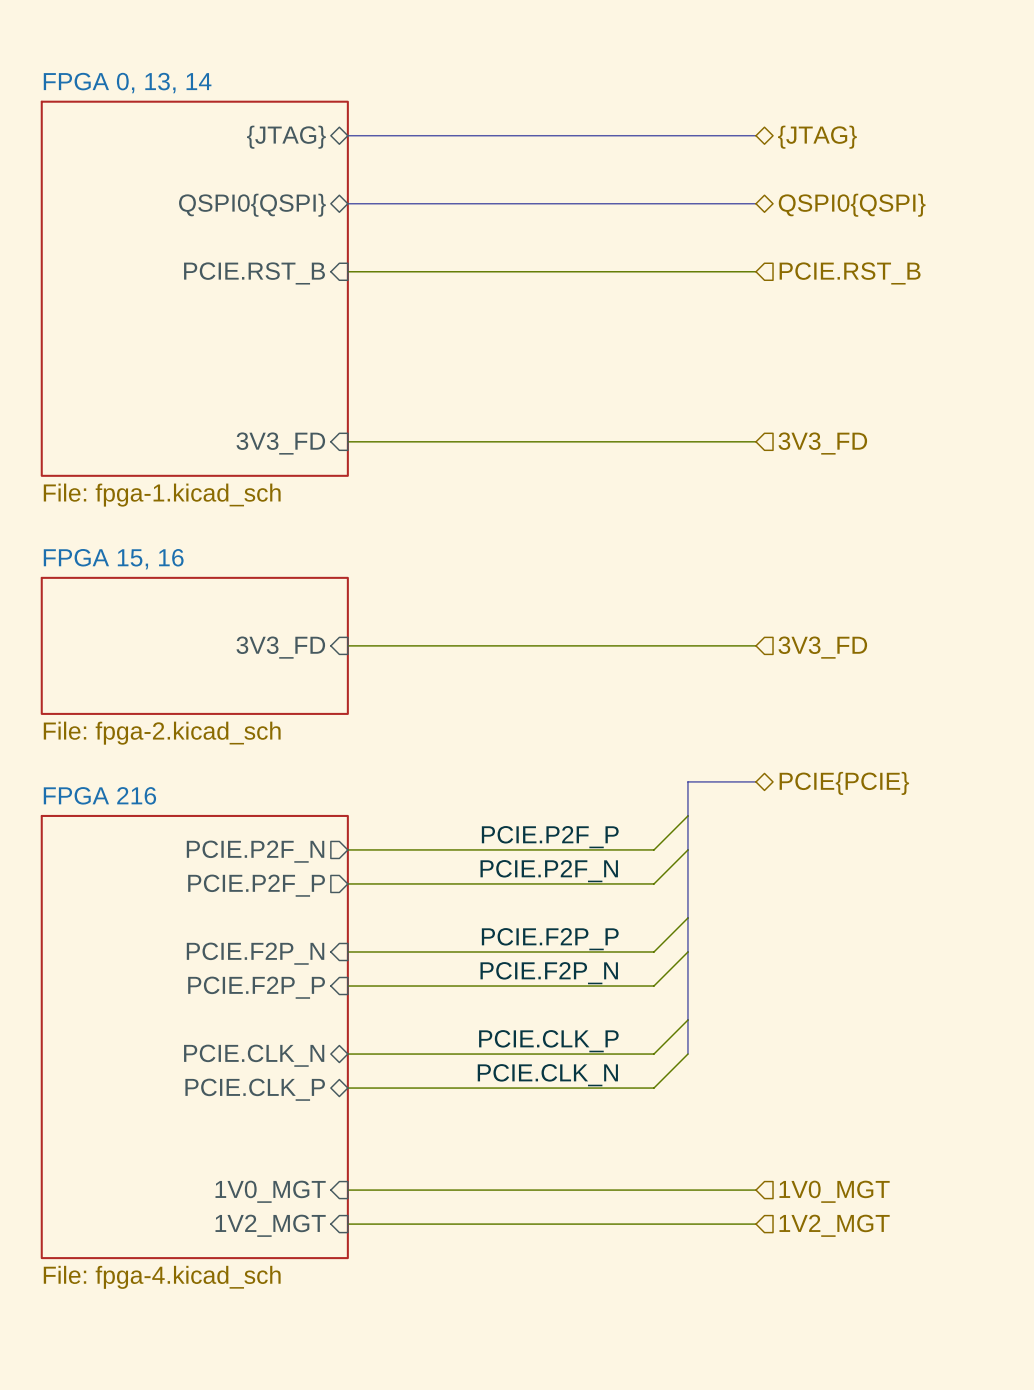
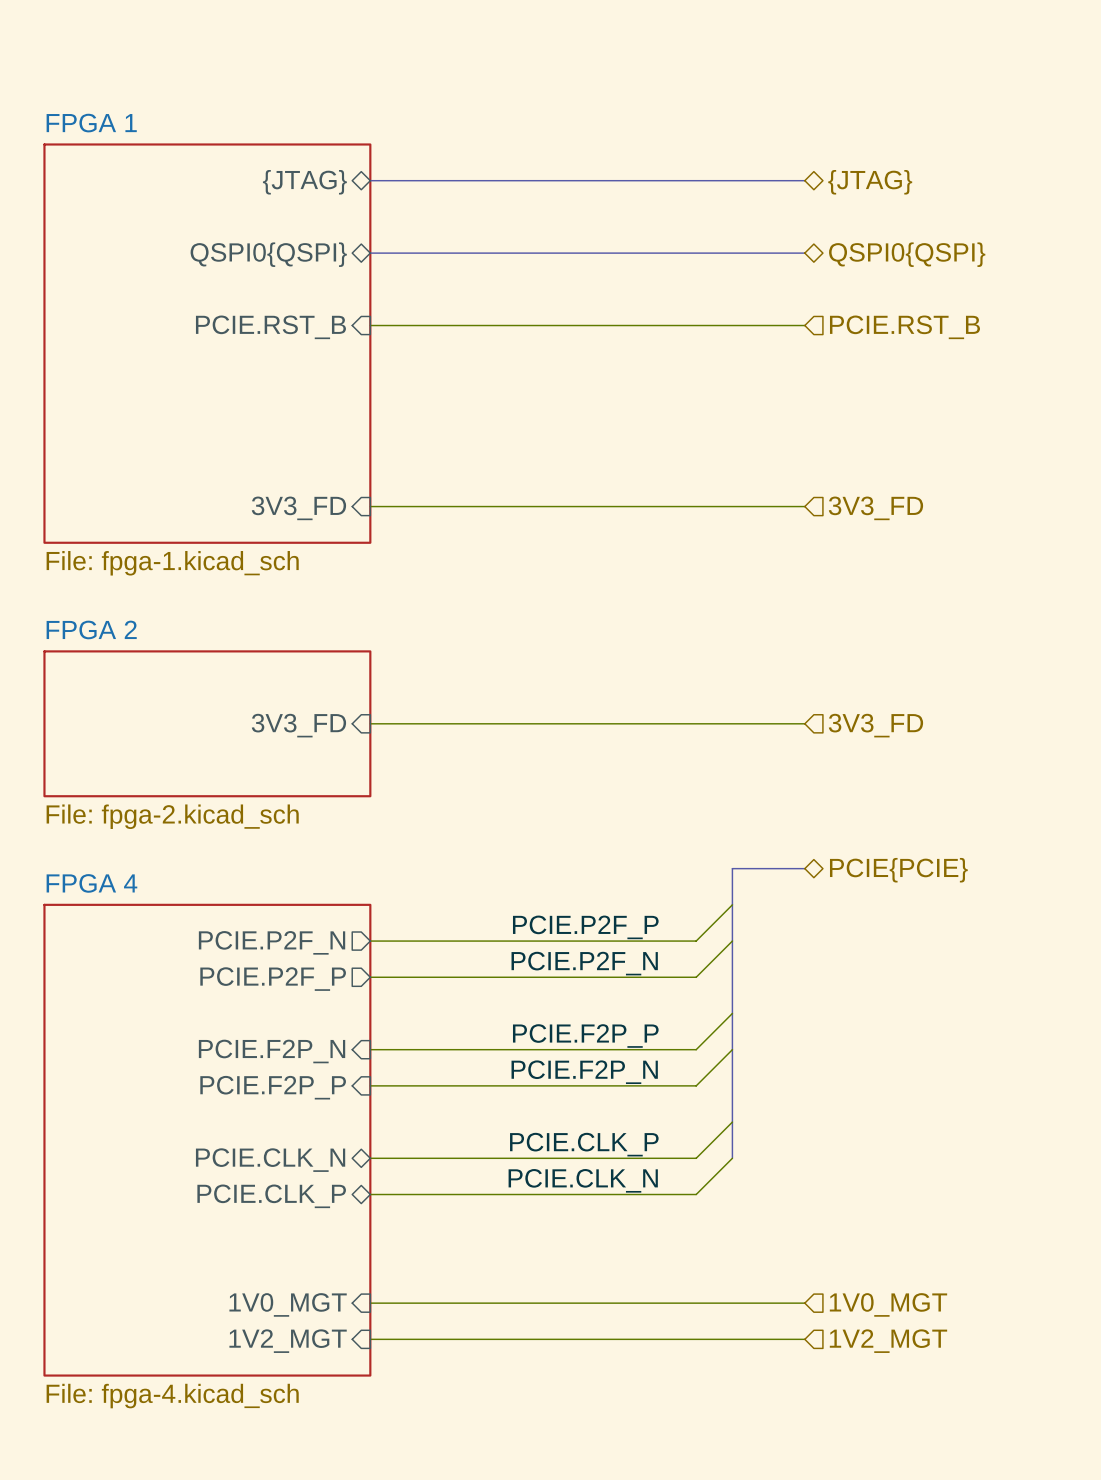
bus: (347, 135) (756, 135) -> (370, 180) (804, 180)
sheet pin position: {JTAG} (286, 137) -> {JTAG} (304, 182)
hierarchical label position: {JTAG} (817, 137) -> {JTAG} (870, 182)
bus: (347, 203) (756, 203) -> (370, 253) (804, 253)
sheet pin position: QSPI0{QSPI} (252, 205) -> QSPI0{QSPI} (268, 254)
hierarchical label position: QSPI0{QSPI} (852, 205) -> QSPI0{QSPI} (907, 254)
wire: (347, 271) (756, 271) -> (370, 325) (804, 325)
sheet pin position: PCIE.RST_B (254, 273) -> PCIE.RST_B (270, 327)
hierarchical label position: PCIE.RST_B (850, 273) -> PCIE.RST_B (904, 327)
sheet FPGA 0, 13, 14: File: fpga-1.kicad_sch (194, 288) -> none
sheet FPGA 1: none -> File: fpga-1.kicad_sch (207, 343)
wire: (347, 441) (756, 441) -> (370, 506) (804, 506)
sheet pin position: 3V3_FD (280, 443) -> 3V3_FD (298, 508)
hierarchical label position: 3V3_FD (822, 443) -> 3V3_FD (875, 508)
sheet FPGA 15, 16: File: fpga-2.kicad_sch (194, 645) -> none
wire: (347, 645) (756, 645) -> (370, 723) (804, 723)
sheet pin position: 3V3_FD (280, 647) -> 3V3_FD (298, 725)
hierarchical label position: 3V3_FD (822, 647) -> 3V3_FD (875, 725)
sheet FPGA 2: none -> File: fpga-2.kicad_sch (207, 723)
bus: (756, 781) (687, 781) (687, 815) -> (804, 868) (732, 868)
hierarchical label position: PCIE{PCIE} (844, 783) -> PCIE{PCIE} (898, 870)
wire: (687, 815) (653, 849) (347, 849) -> (732, 941) (696, 977) (370, 977)
label: PCIE.P2F_P (550, 837) -> none
sheet pin: PCIE.P2F_N (255, 851) -> none
label: PCIE.P2F_N (549, 871) -> PCIE.P2F_P (585, 927)
sheet pin: PCIE.P2F_P (256, 885) -> PCIE.P2F_N (272, 942)
wire: (687, 917) (653, 951) (347, 951) -> (732, 1049) (696, 1085) (370, 1085)
label: PCIE.F2P_P (550, 939) -> PCIE.P2F_N (584, 963)
sheet pin shape: input (255, 953) -> output (273, 979)
sheet pin: PCIE.F2P_N (255, 953) -> PCIE.P2F_P (273, 979)
label: PCIE.F2P_N (549, 973) -> PCIE.F2P_P (585, 1036)
sheet pin: PCIE.F2P_P (256, 987) -> PCIE.F2P_N (272, 1051)
label: none -> PCIE.F2P_N (584, 1072)
wire: (687, 1020) (653, 1054) (347, 1054) -> (732, 1158) (696, 1194) (370, 1194)
sheet pin: none -> PCIE.F2P_P (273, 1087)
sheet FPGA 216: File: fpga-4.kicad_sch (194, 1037) -> none
label: PCIE.CLK_P (548, 1041) -> none
bus: none -> (732, 1122) (732, 1158)
sheet pin: PCIE.CLK_N (254, 1055) -> none
sheet FPGA 4: none -> File: fpga-4.kicad_sch (207, 1140)
label: PCIE.CLK_N (547, 1075) -> PCIE.CLK_P (584, 1144)
sheet pin: PCIE.CLK_P (255, 1089) -> PCIE.CLK_N (270, 1160)
label: none -> PCIE.CLK_N (583, 1180)
sheet pin: none -> PCIE.CLK_P (271, 1196)
wire: (347, 1190) (756, 1190) -> (370, 1339) (804, 1339)
sheet pin: 1V0_MGT (270, 1191) -> none
hierarchical label: 1V0_MGT (834, 1191) -> none
sheet pin: 1V2_MGT (270, 1225) -> 1V0_MGT (288, 1304)
hierarchical label: 1V2_MGT (834, 1225) -> 1V0_MGT (888, 1304)
sheet pin: none -> 1V2_MGT (288, 1341)
hierarchical label: none -> 1V2_MGT (888, 1341)

